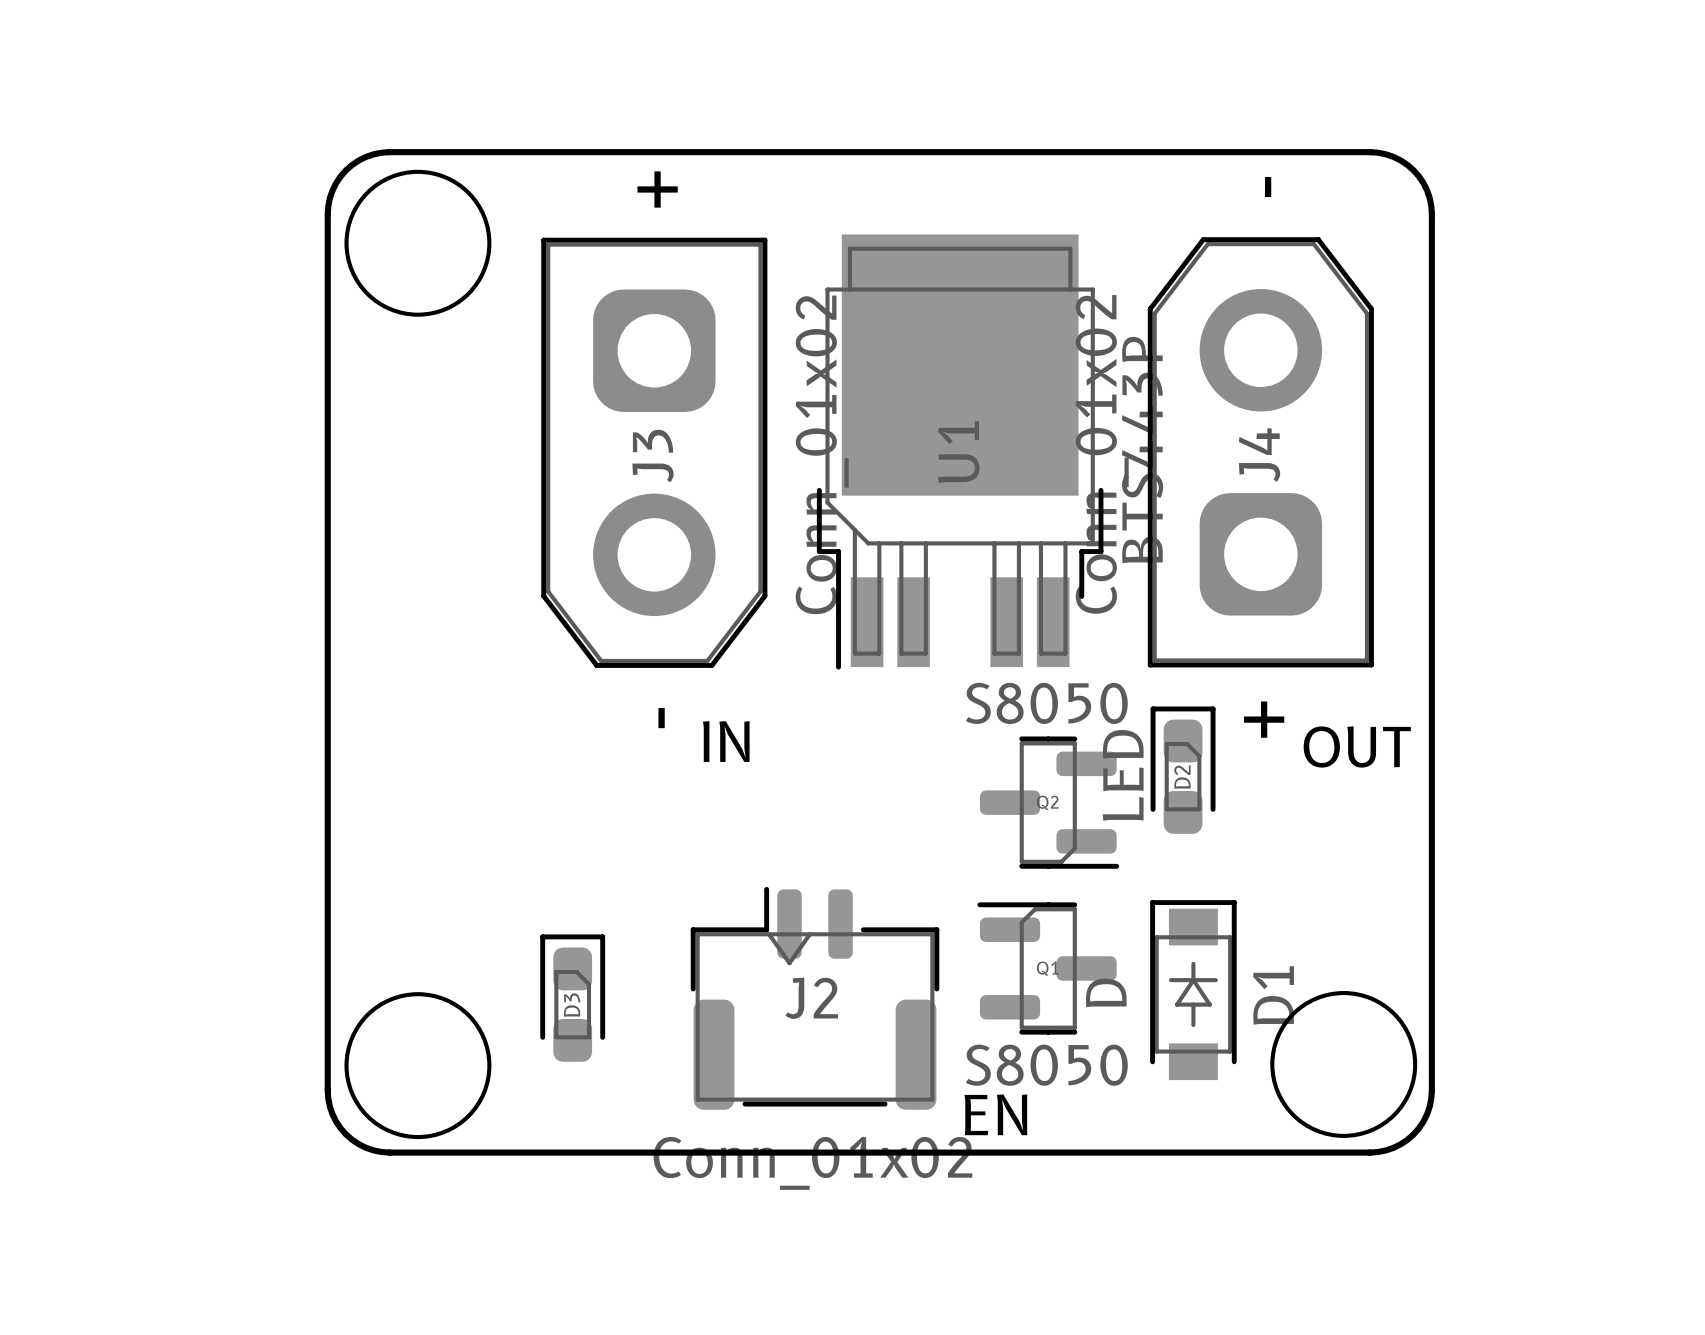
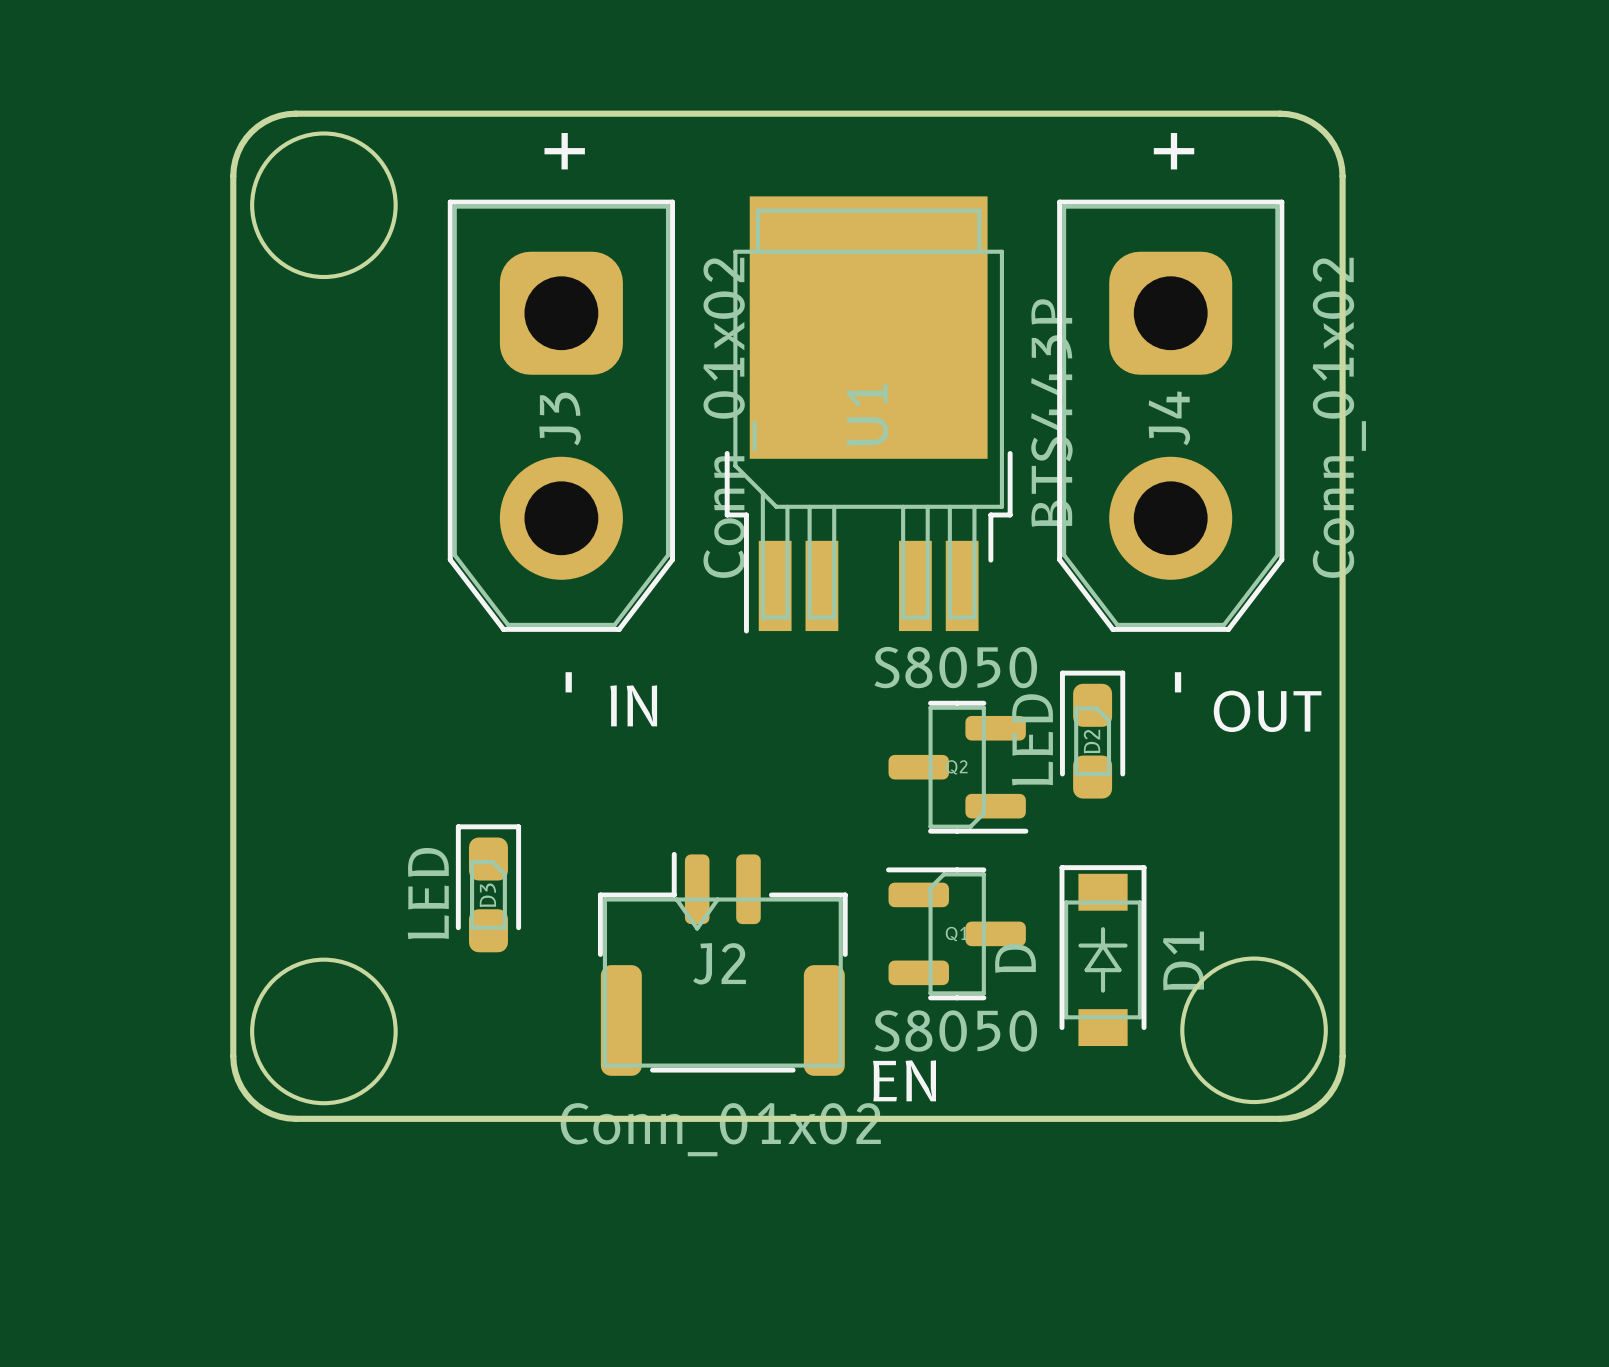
J4 rotation: 0° (1260, 452) -> 180° (1170, 415)
D3 value: none -> LED (428, 893)
D3 position: (572, 998) -> (488, 888)

